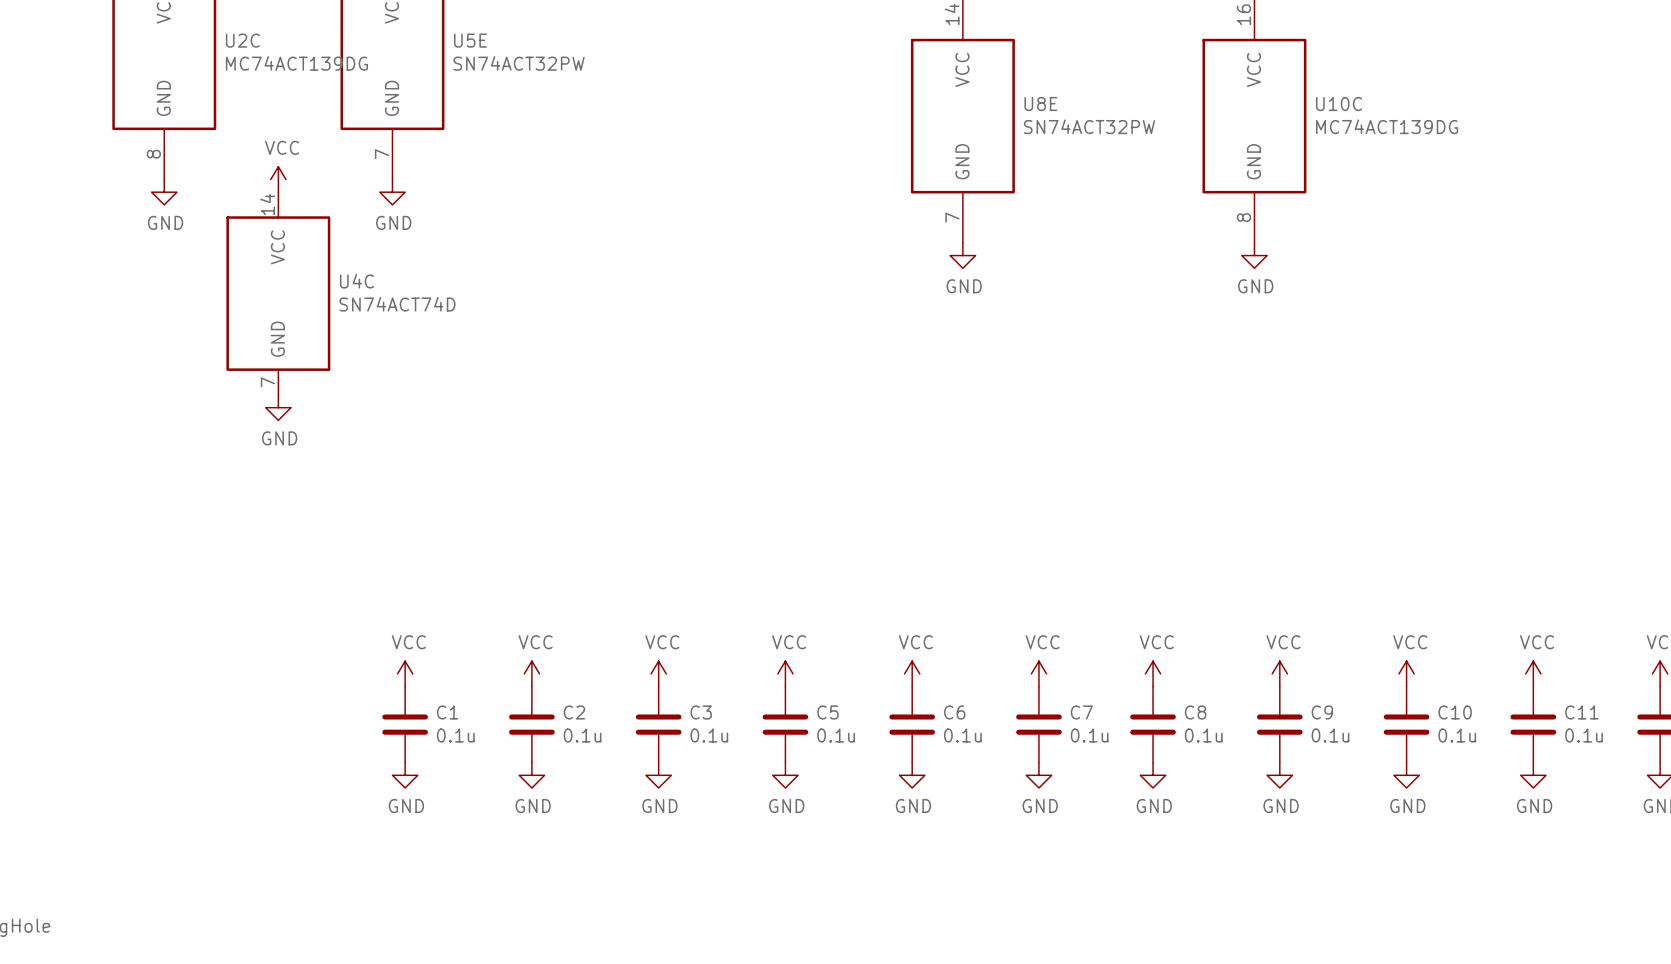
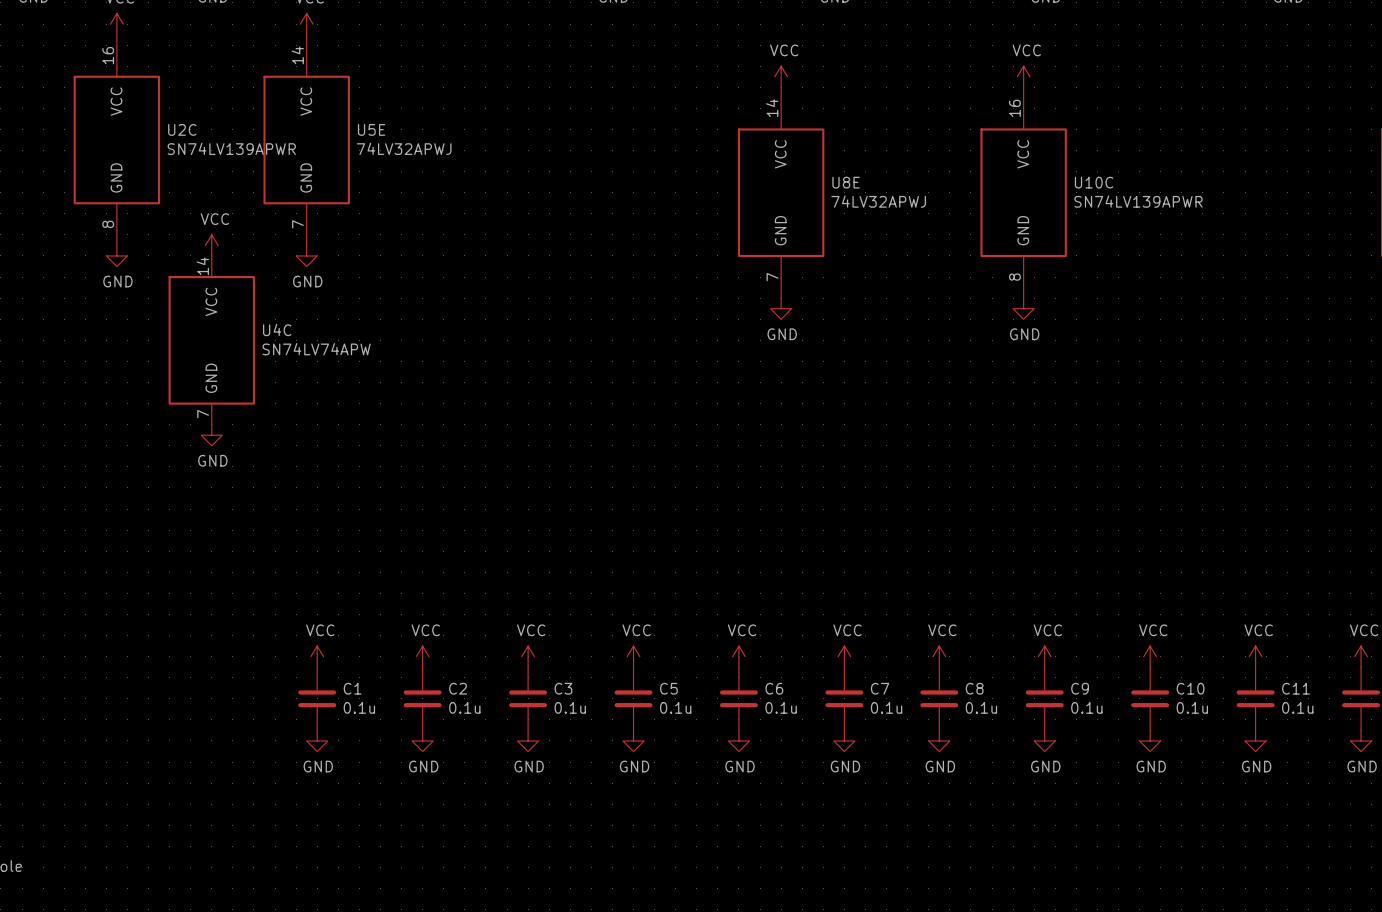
U2C value: MC74ACT139DG (296, 63) -> SN74LV139APWR (231, 148)
U5E value: SN74ACT32PW (519, 63) -> 74LV32APWJ (404, 148)
U8E value: SN74ACT32PW (1089, 126) -> 74LV32APWJ (878, 201)
U10C value: MC74ACT139DG (1387, 126) -> SN74LV139APWR (1138, 201)
U4C value: SN74ACT74D (397, 304) -> SN74LV74APW (316, 349)

